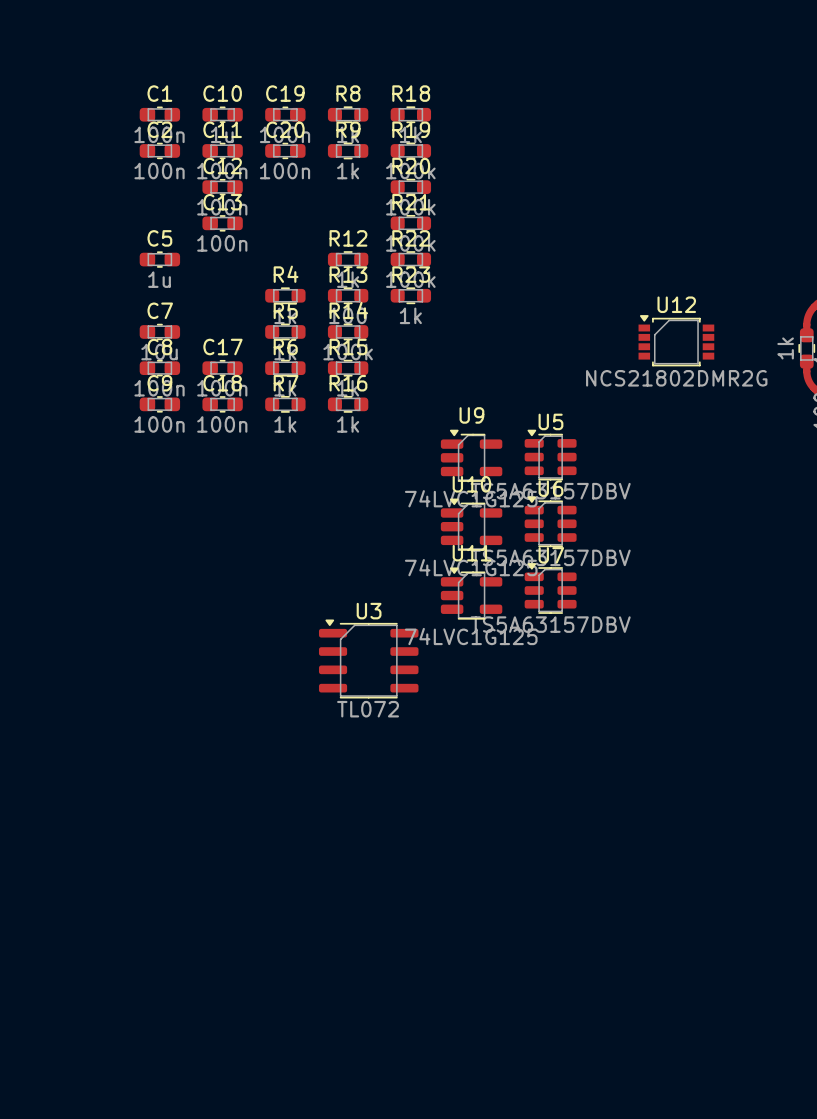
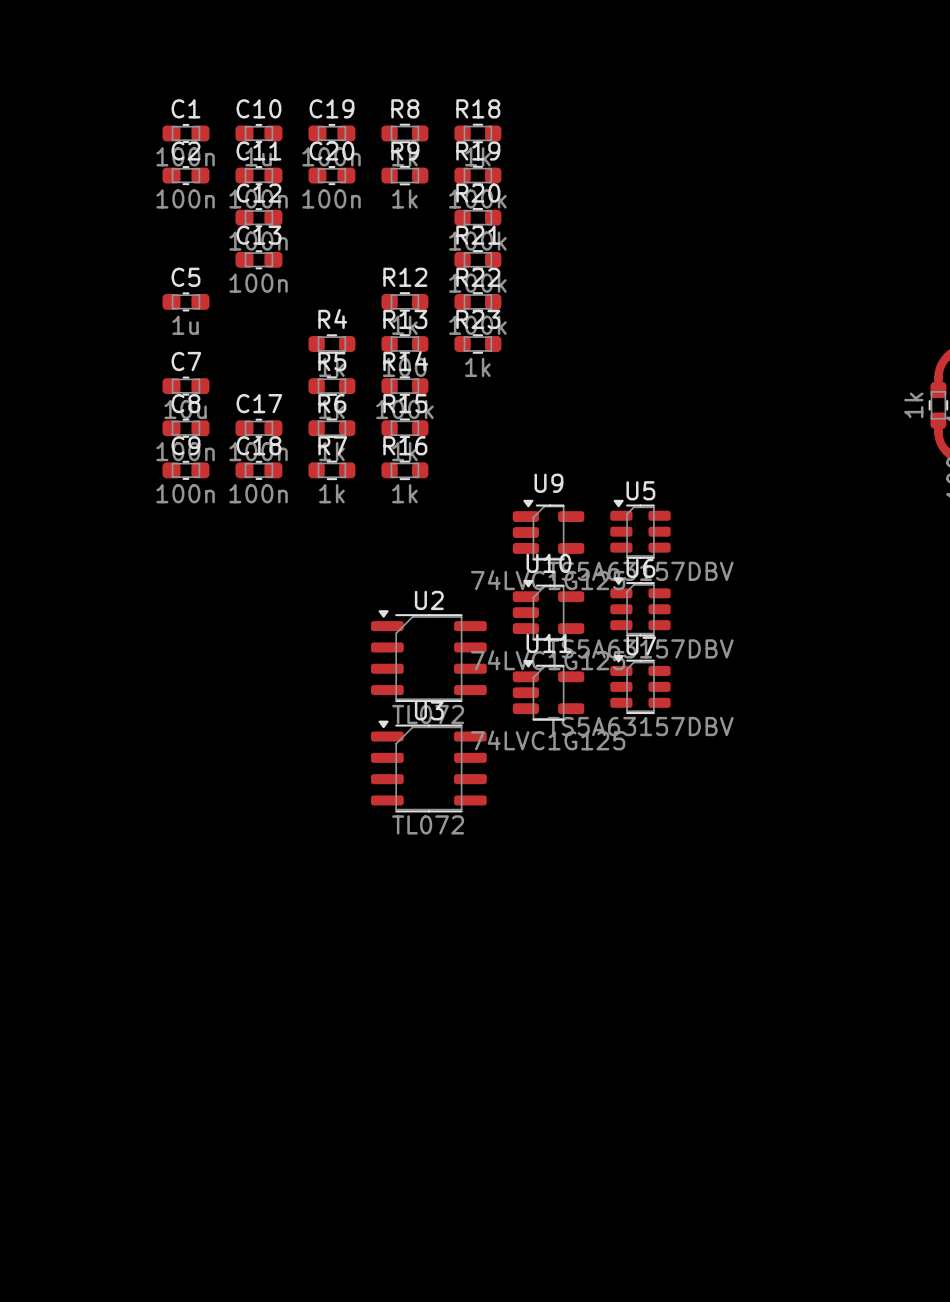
U12: NCS21802DMR2G (676, 340) -> none
U2: none -> TL072 (428, 656)

